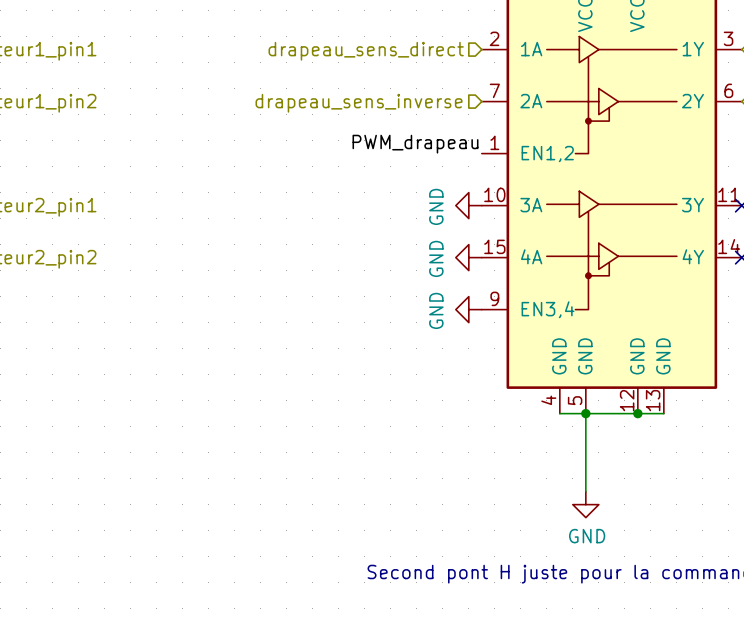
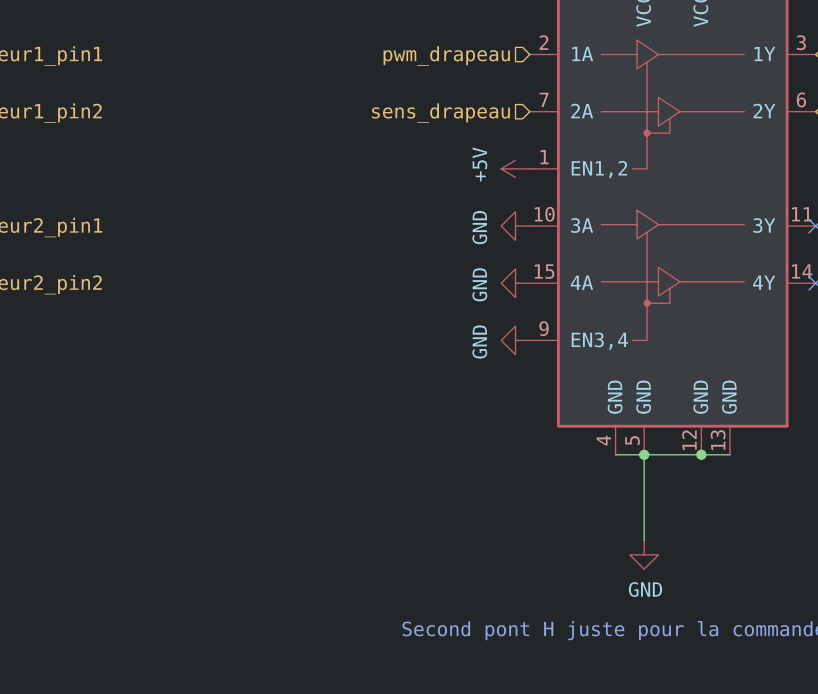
hierarchical label: drapeau_sens_direct (366, 51) -> pwm_drapeau (446, 55)
hierarchical label: drapeau_sens_inverse (359, 103) -> sens_drapeau (440, 113)
label: PWM_drapeau (415, 144) -> none
power symbol: none -> +5V (515, 168)

